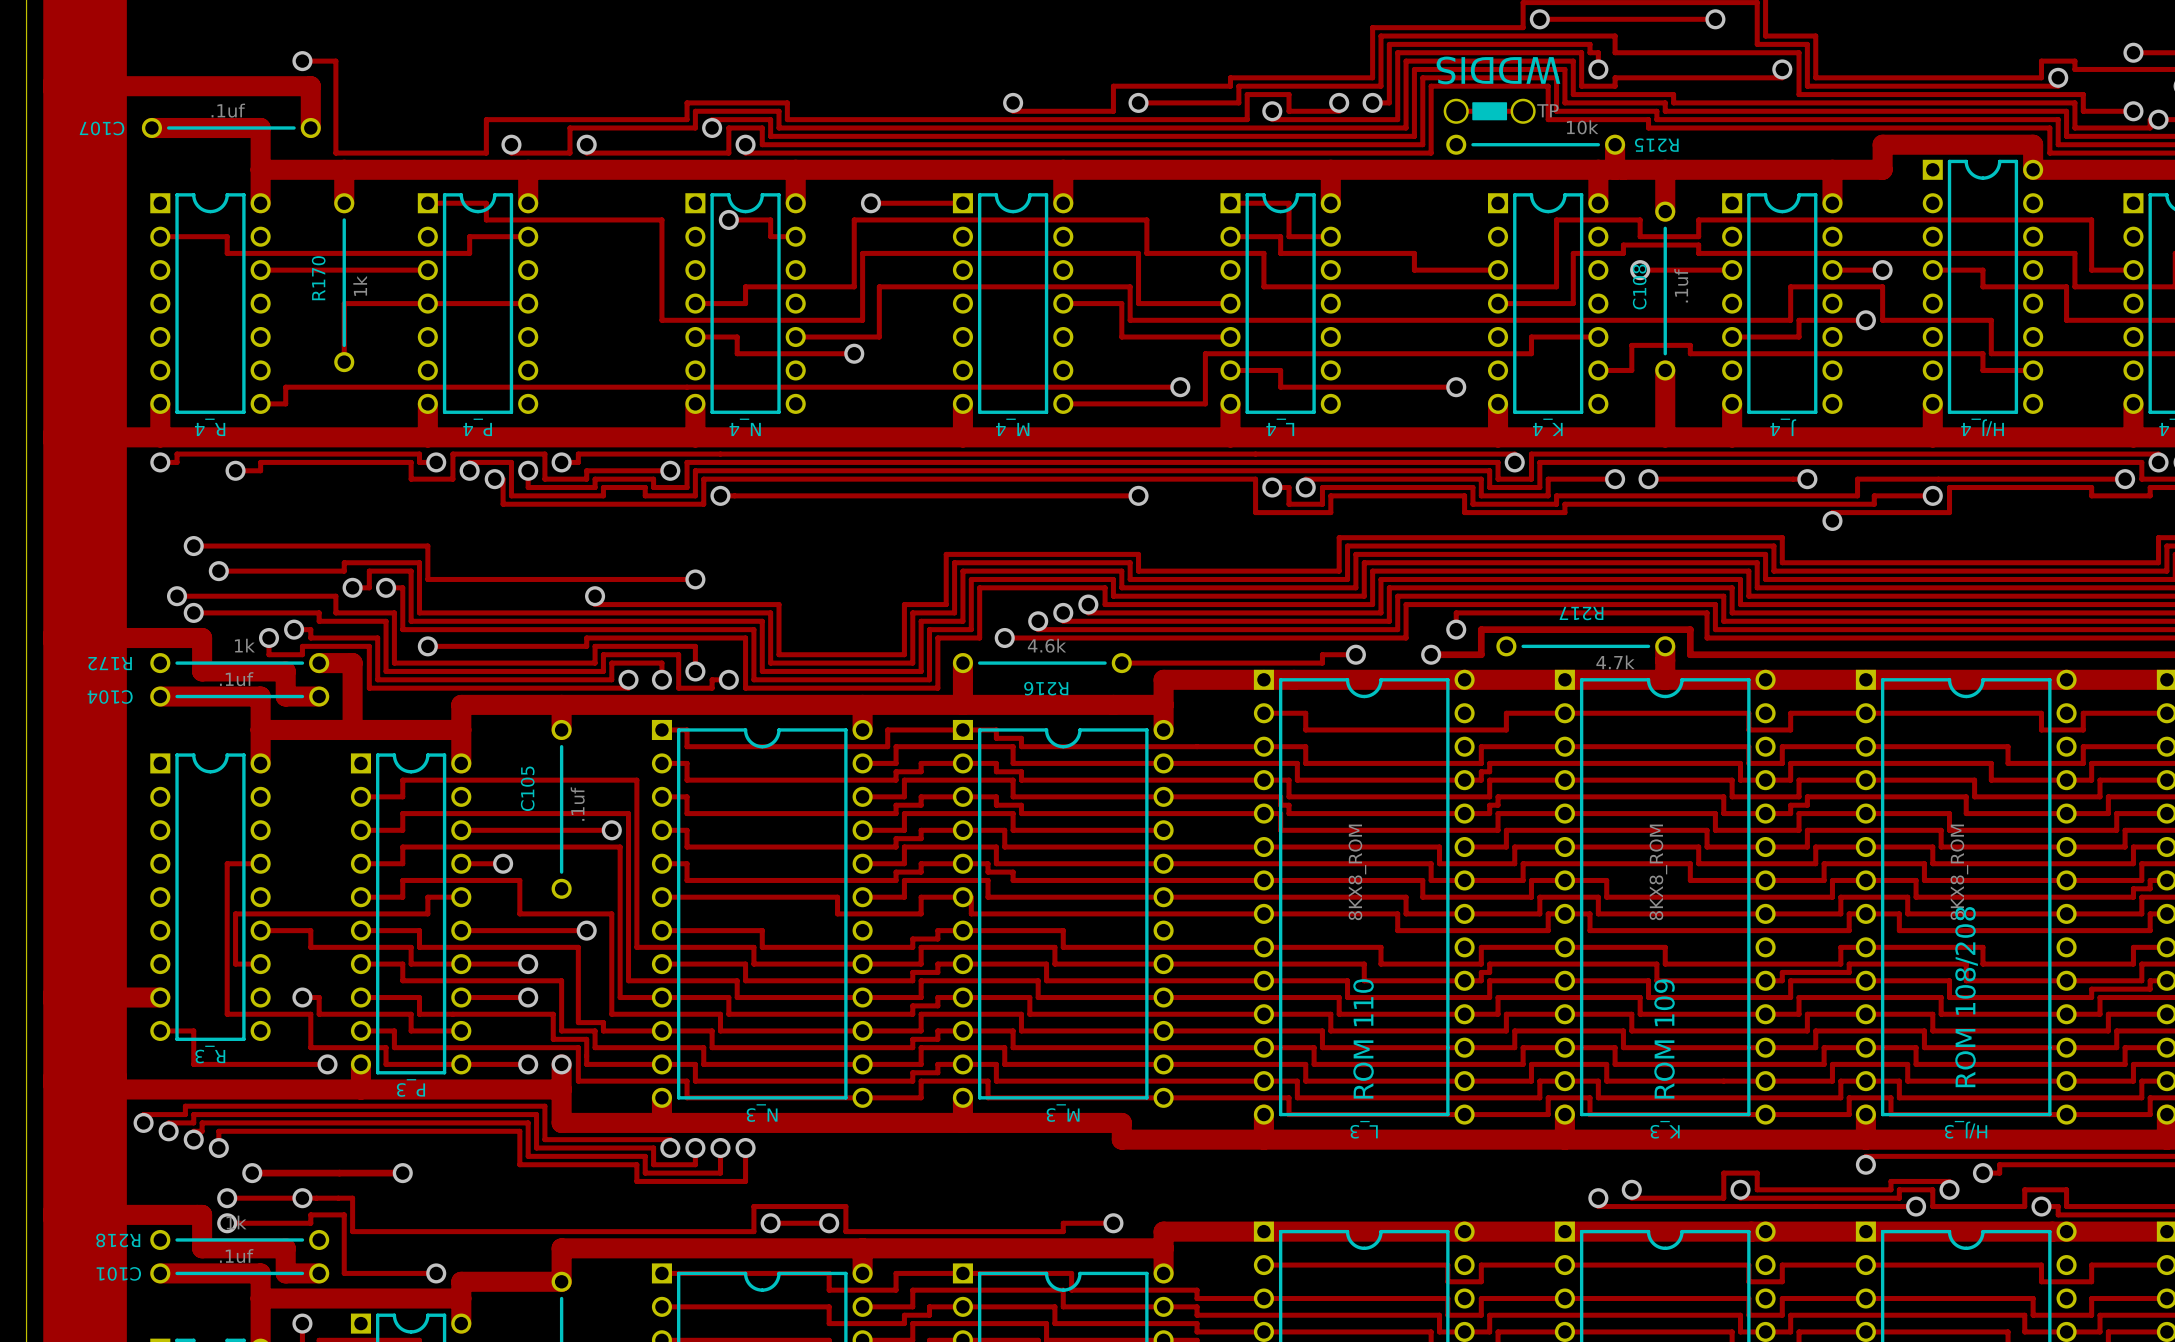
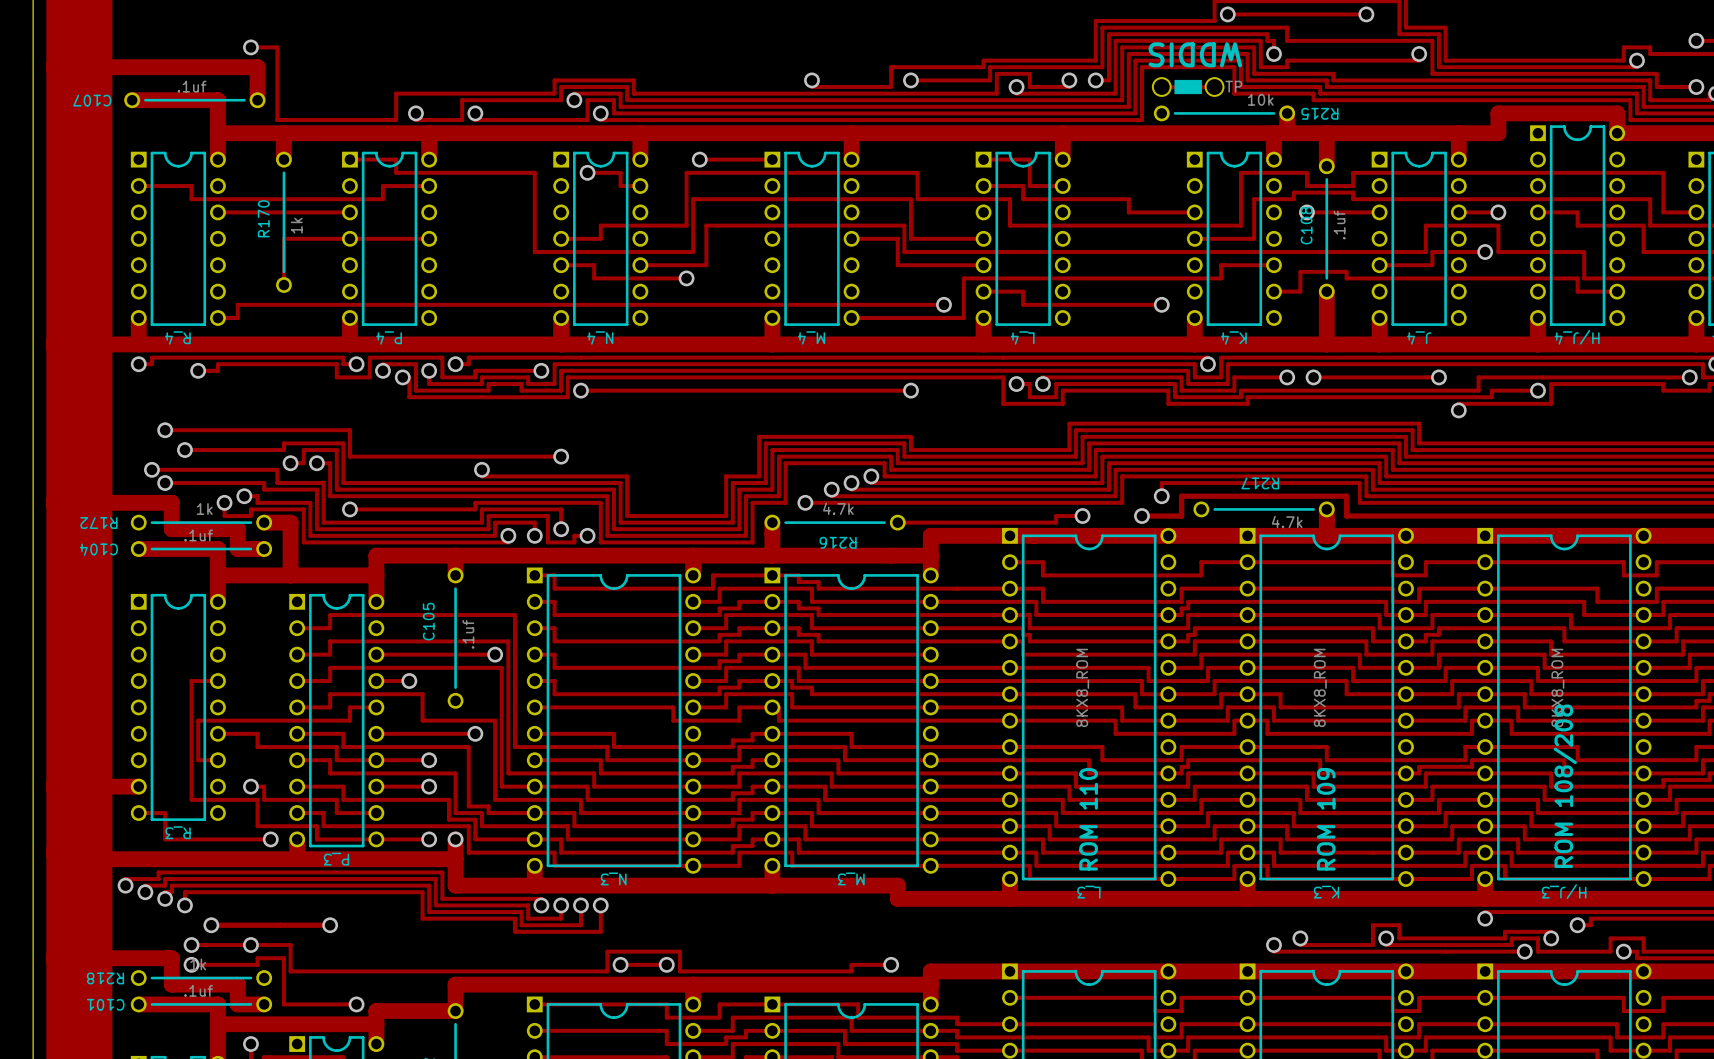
R216 value: 4.6k (1046, 645) -> 4.7k (838, 508)

